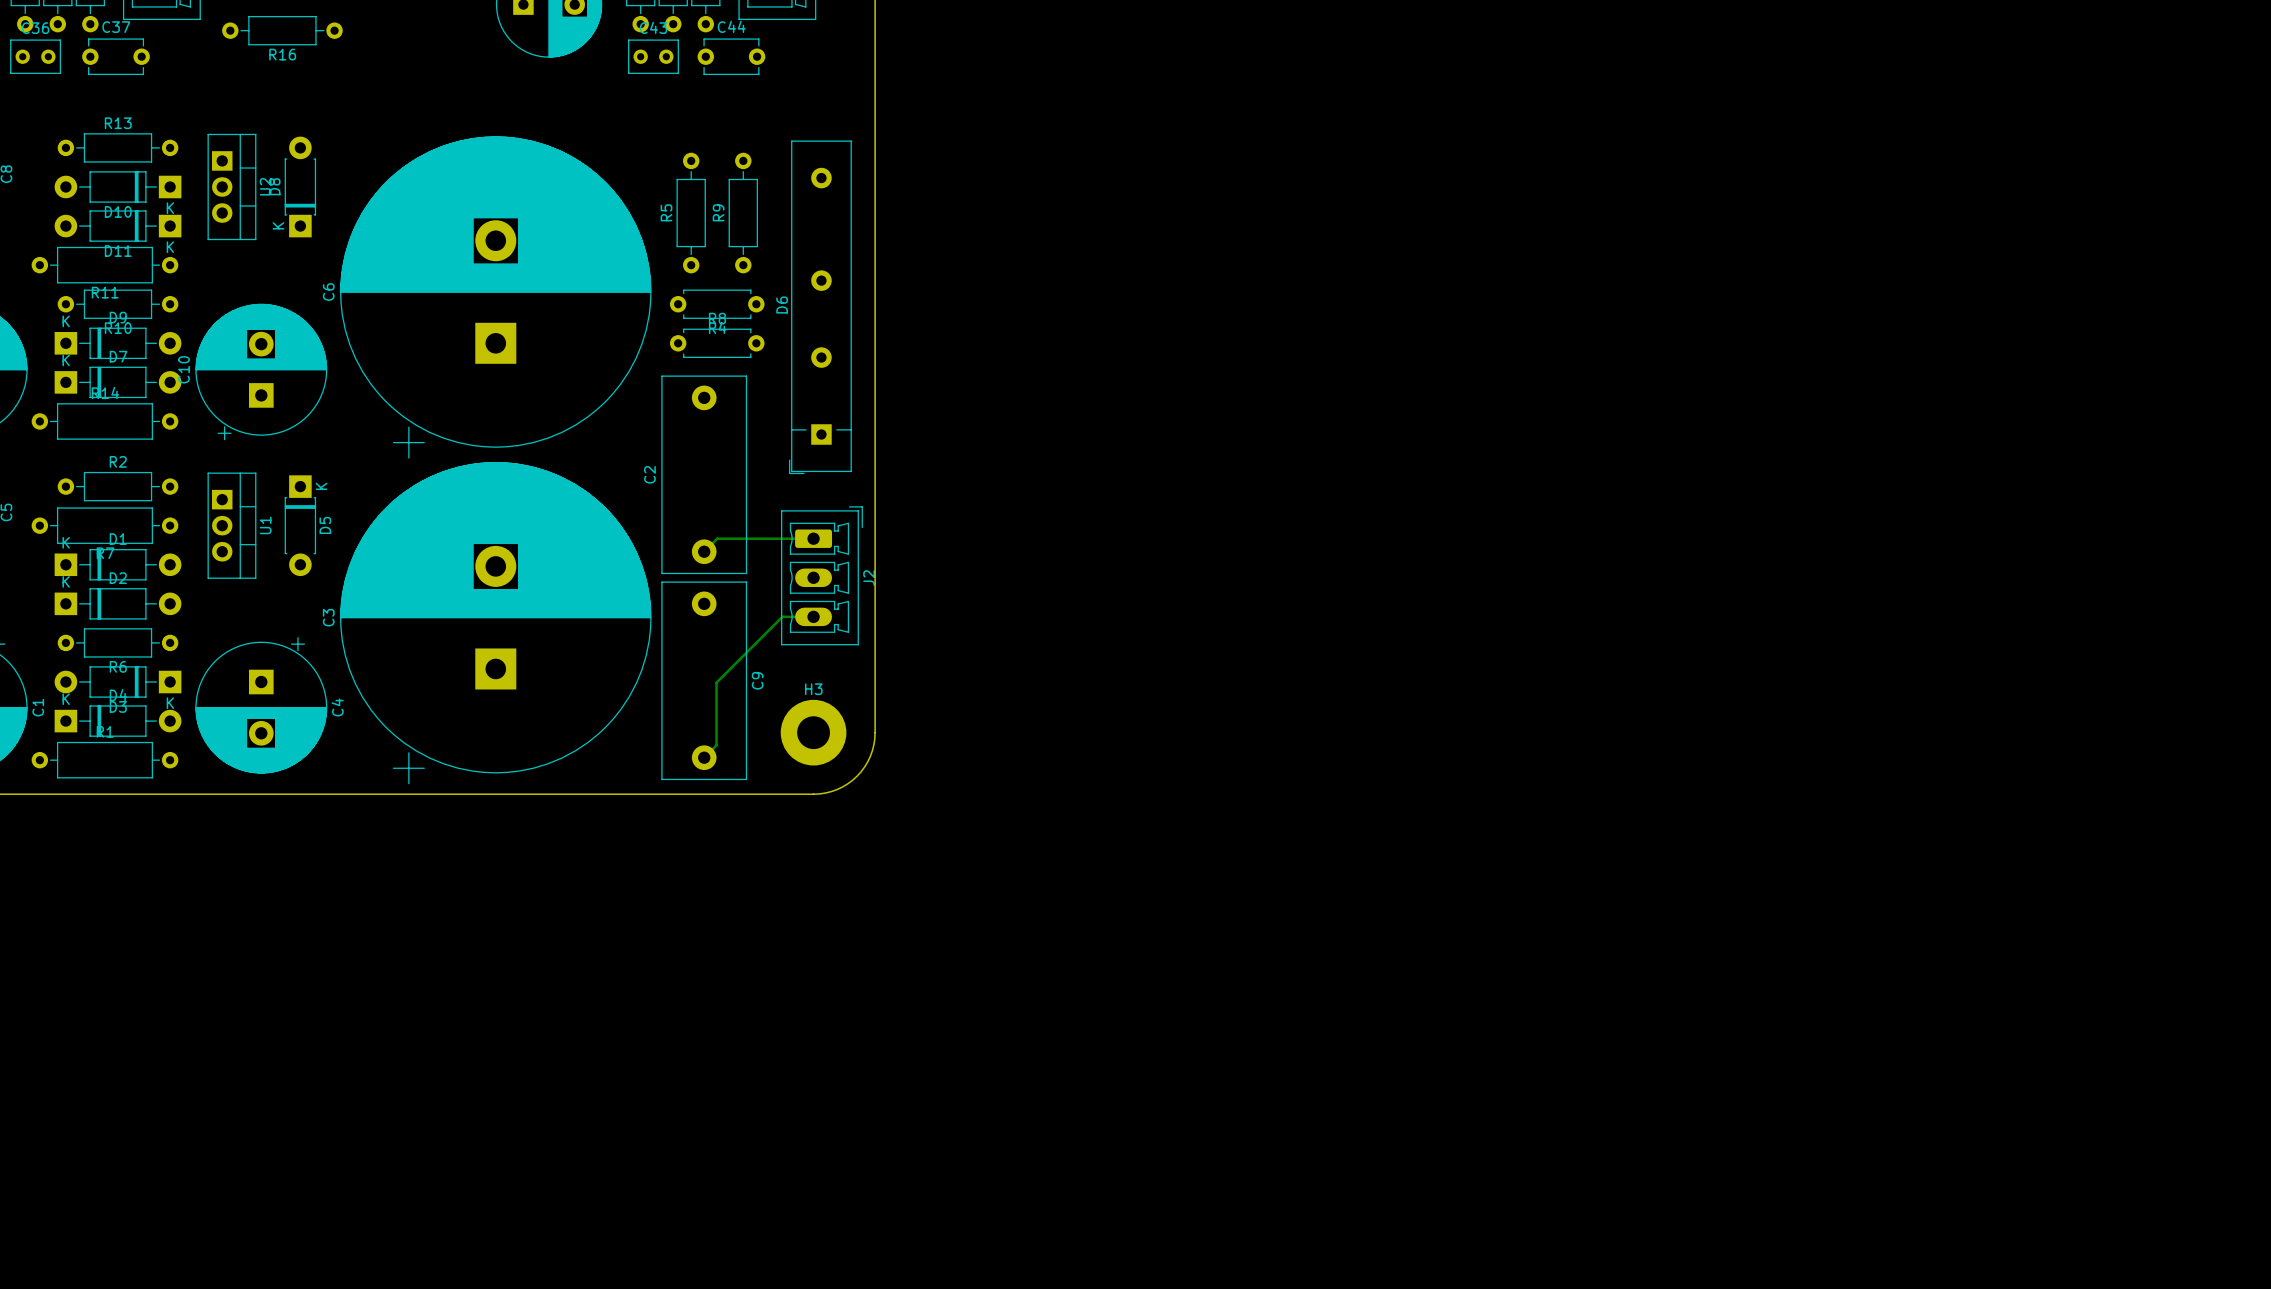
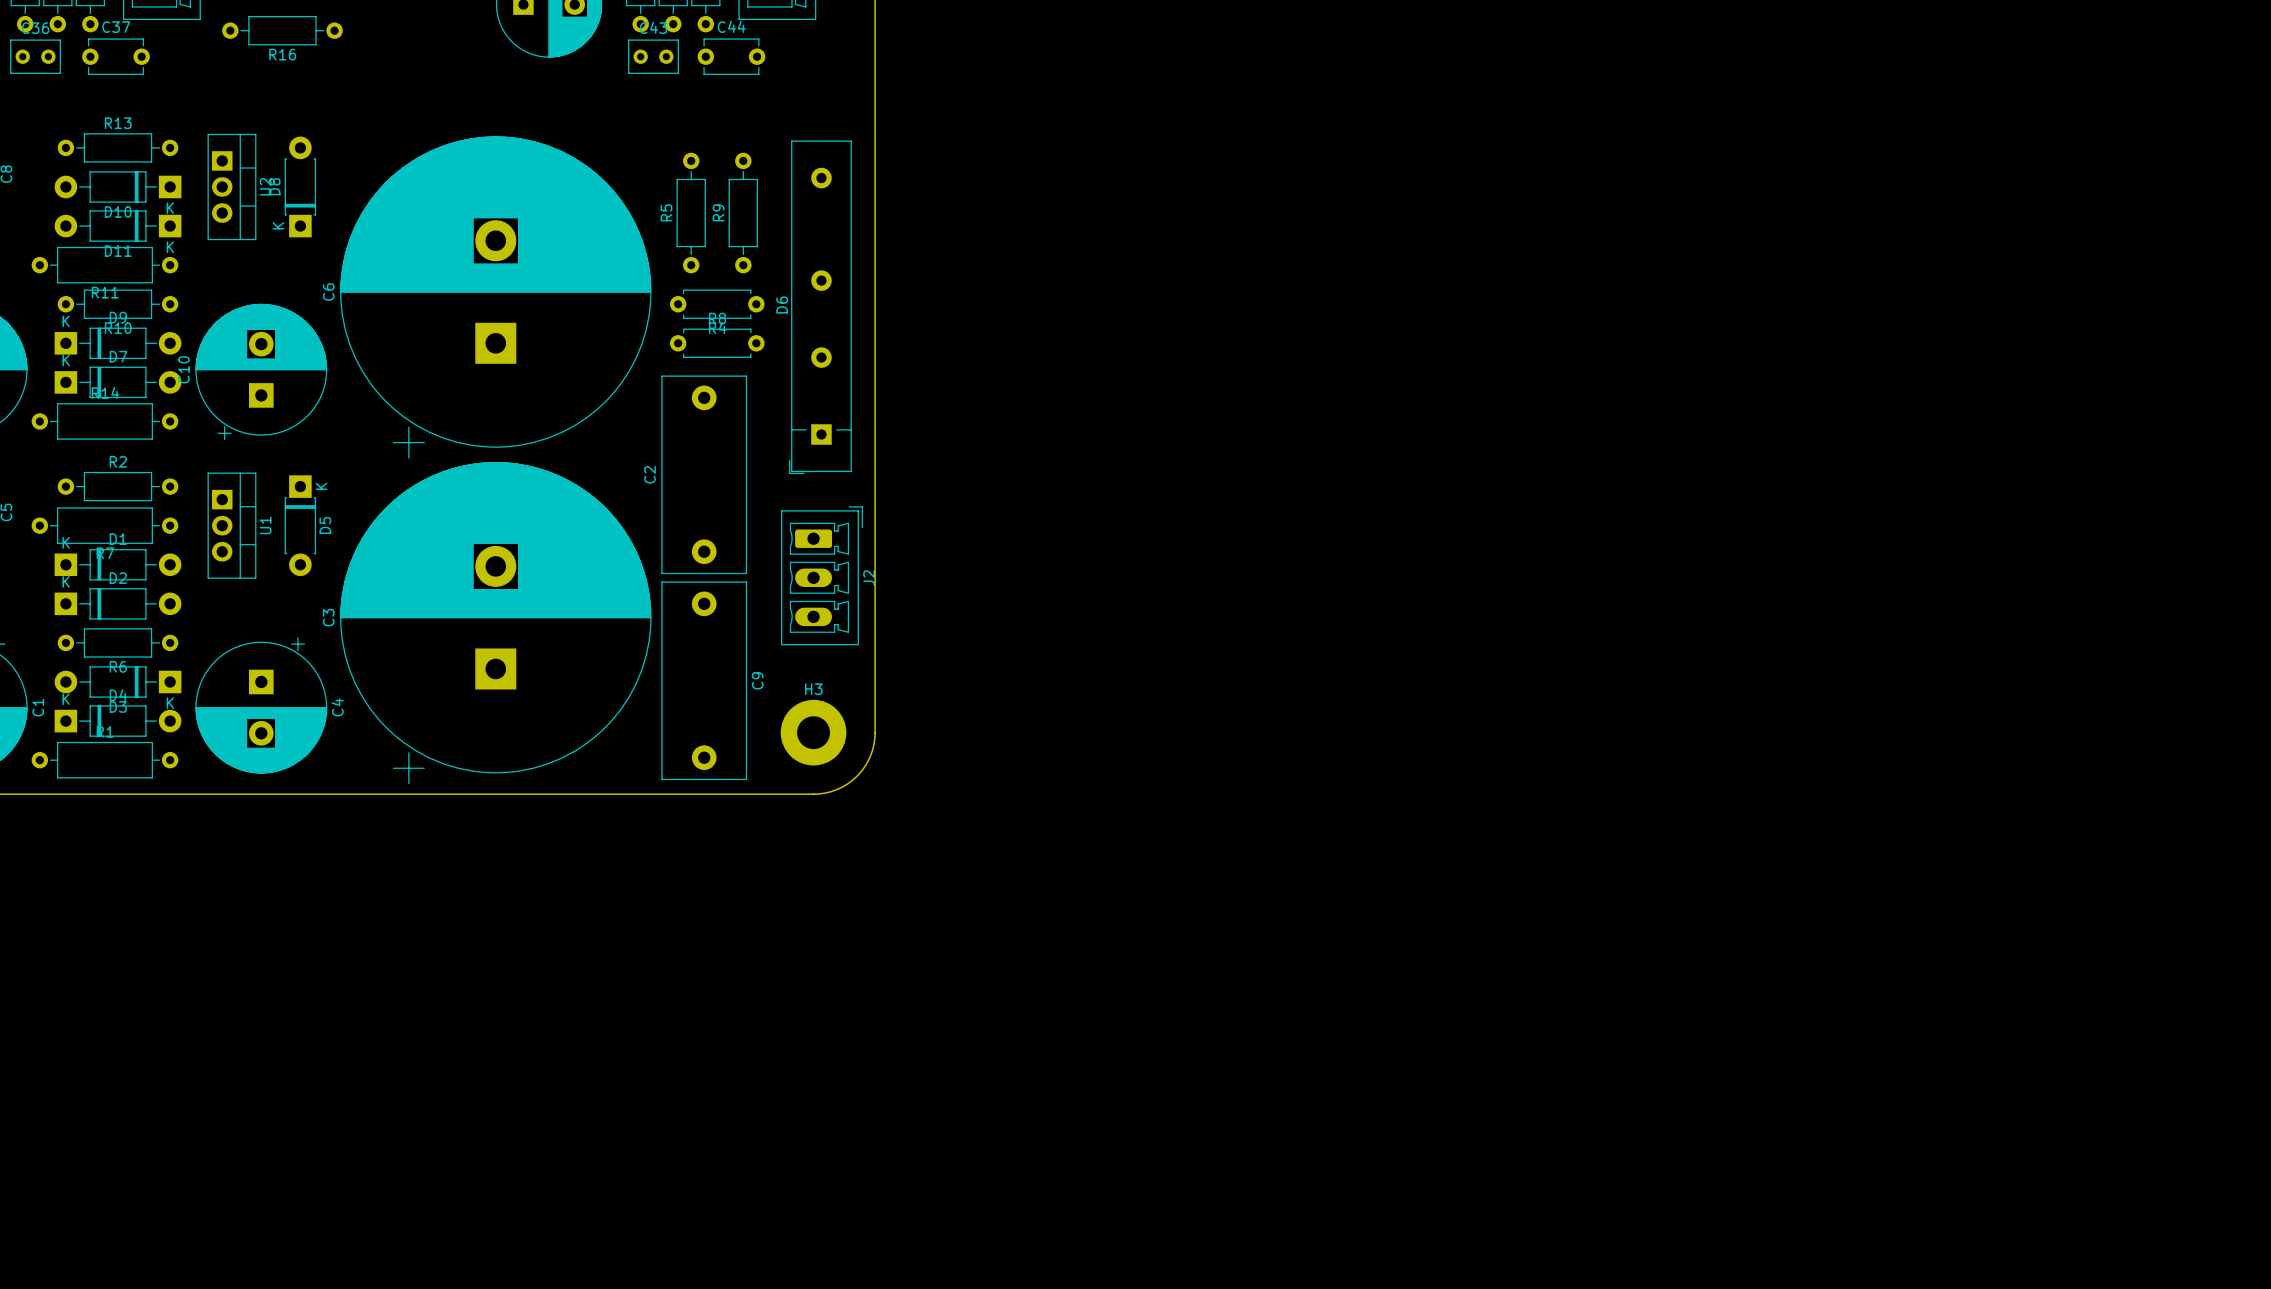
bottom track: (813, 538) (717, 538) (704, 551) -> none
bottom track: (813, 616) (782, 616) (716, 682) (716, 745) (704, 757) -> none

